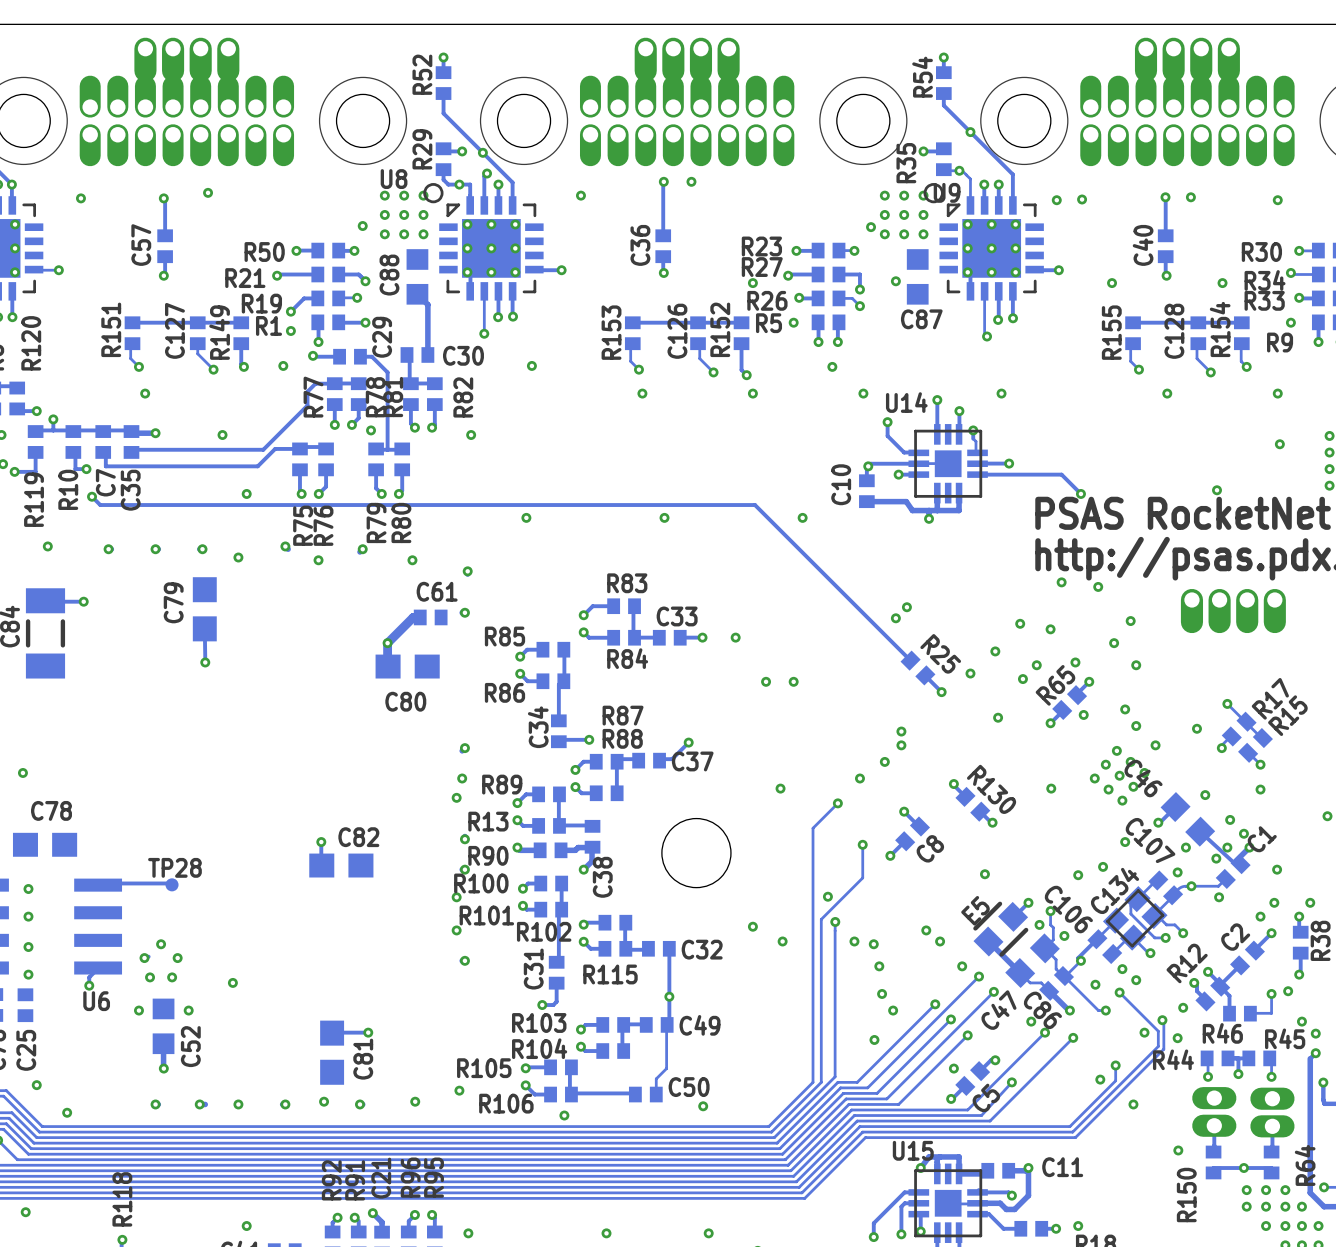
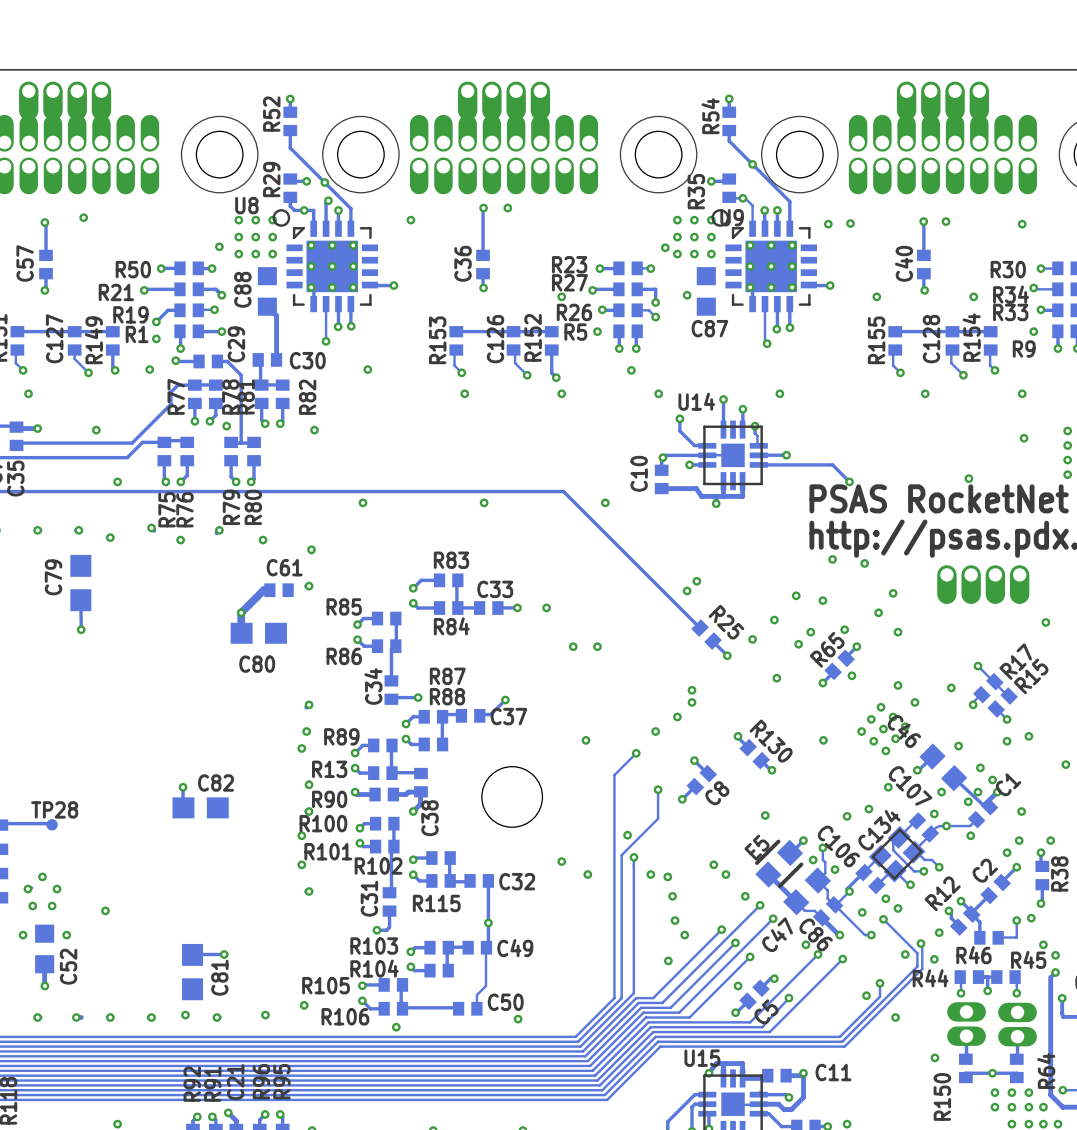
via: none -> (1045, 622)
via: (1125, 709) -> none
via: none -> (1028, 736)

